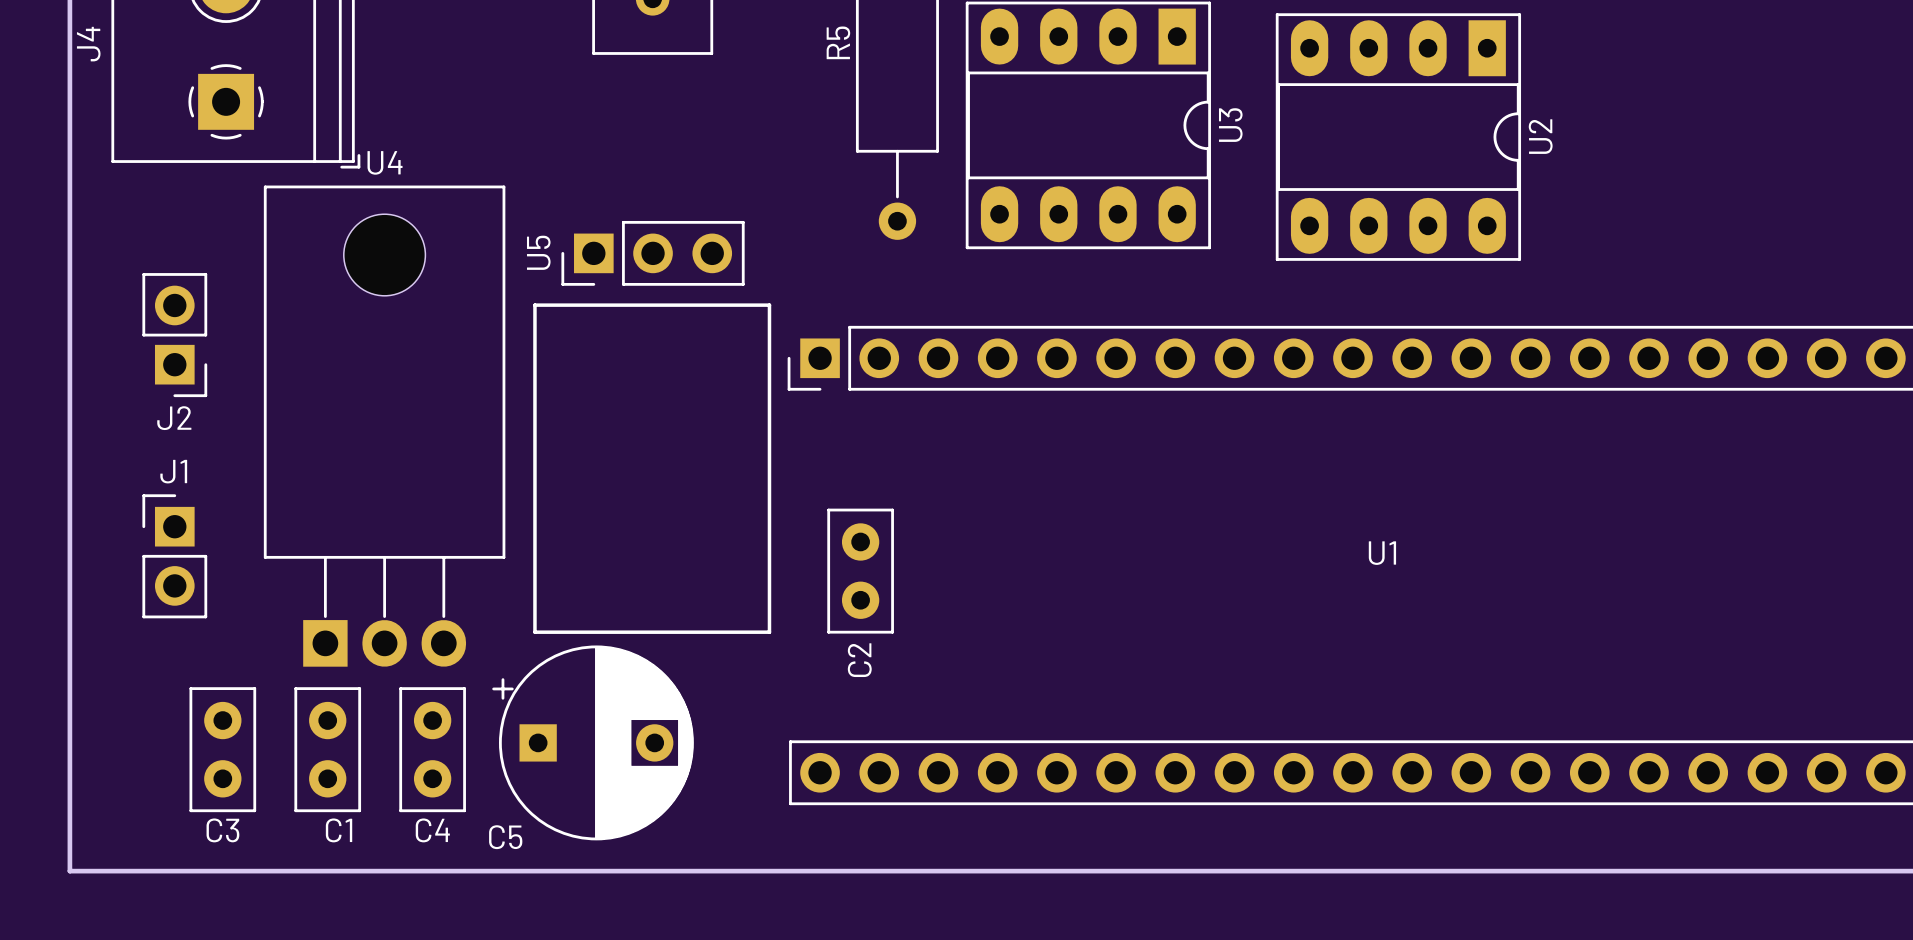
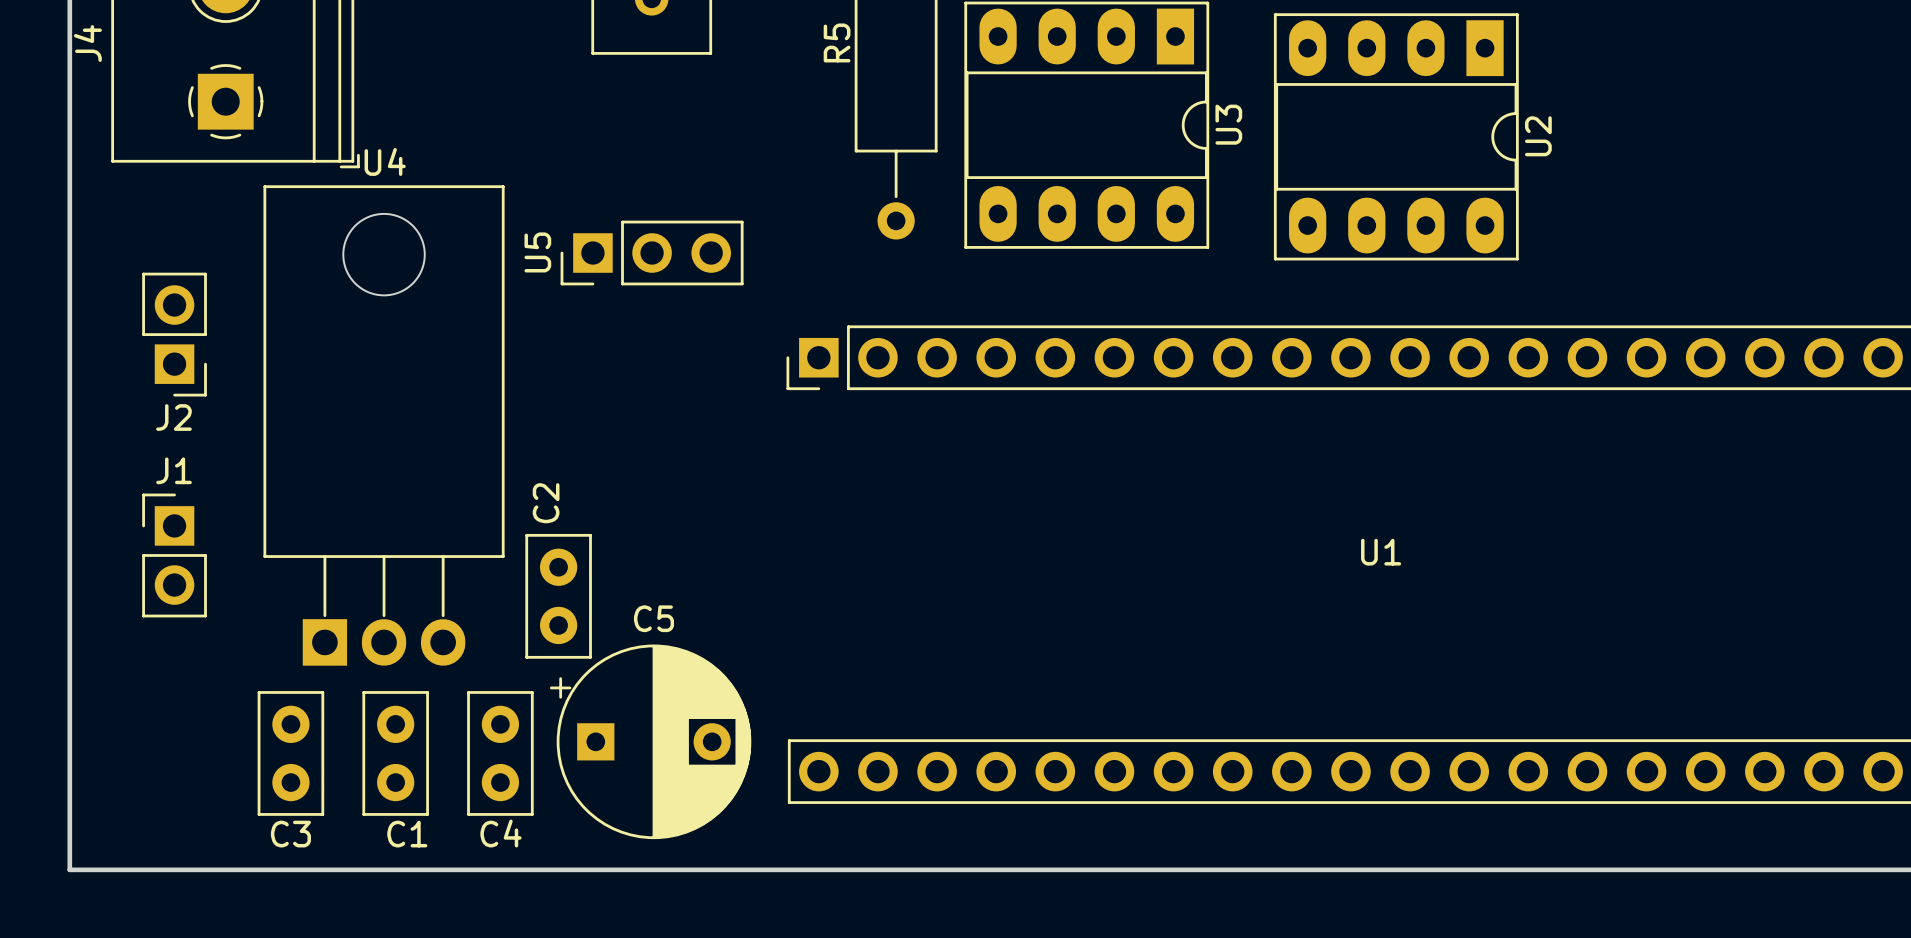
line: (534, 305) (769, 305) (769, 632) (534, 632) (534, 305) -> none
C2 position: (860, 571) -> (558, 596)
C2 name position: C2 (859, 660) -> C2 (546, 503)
C5 position: (593, 742) -> (650, 741)
C3 position: (222, 749) -> (290, 753)
C1 position: (327, 749) -> (395, 753)
C4 position: (432, 749) -> (500, 753)
C5 name position: C5 (505, 837) -> C5 (653, 618)

